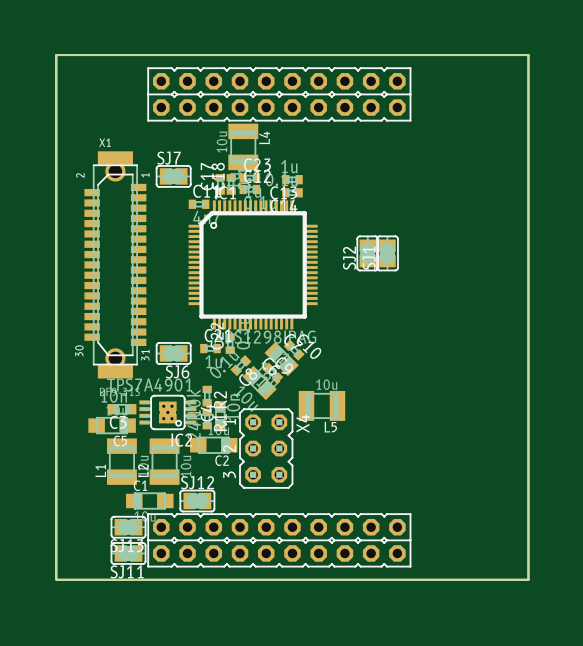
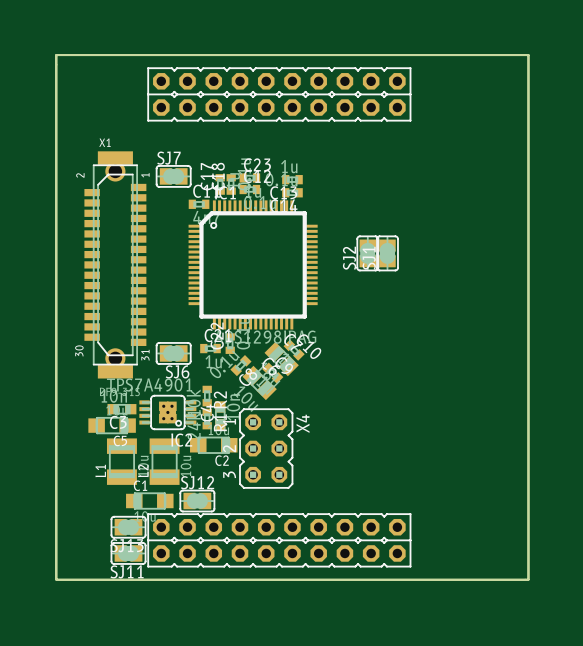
L4: 10u (243, 146) -> none
L5: 10u (321, 405) -> none

